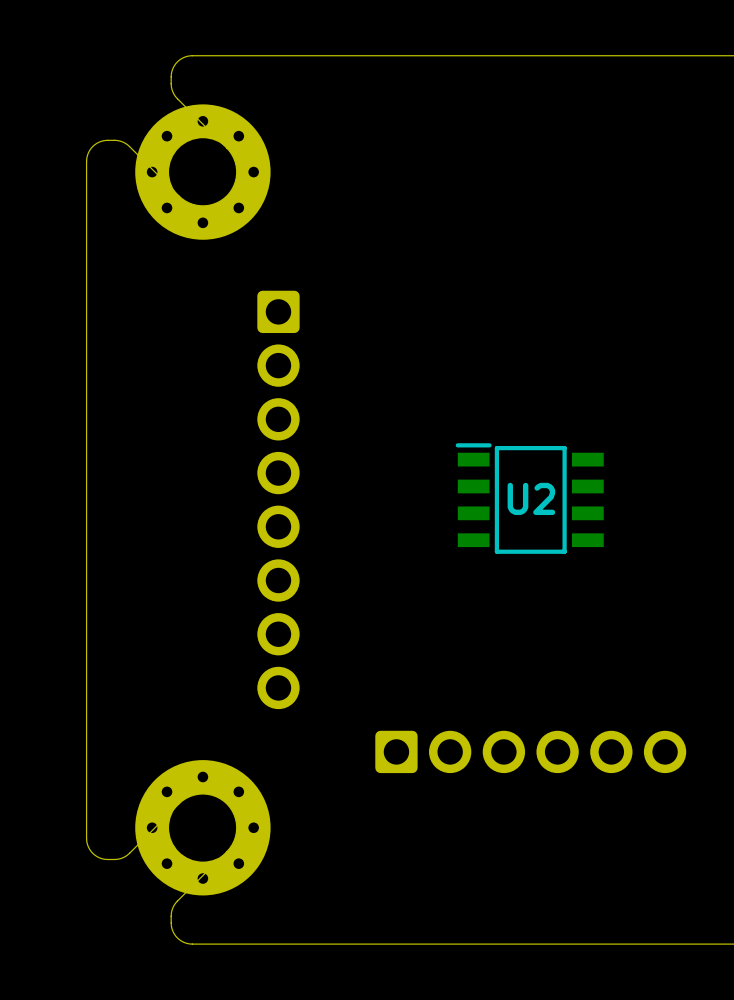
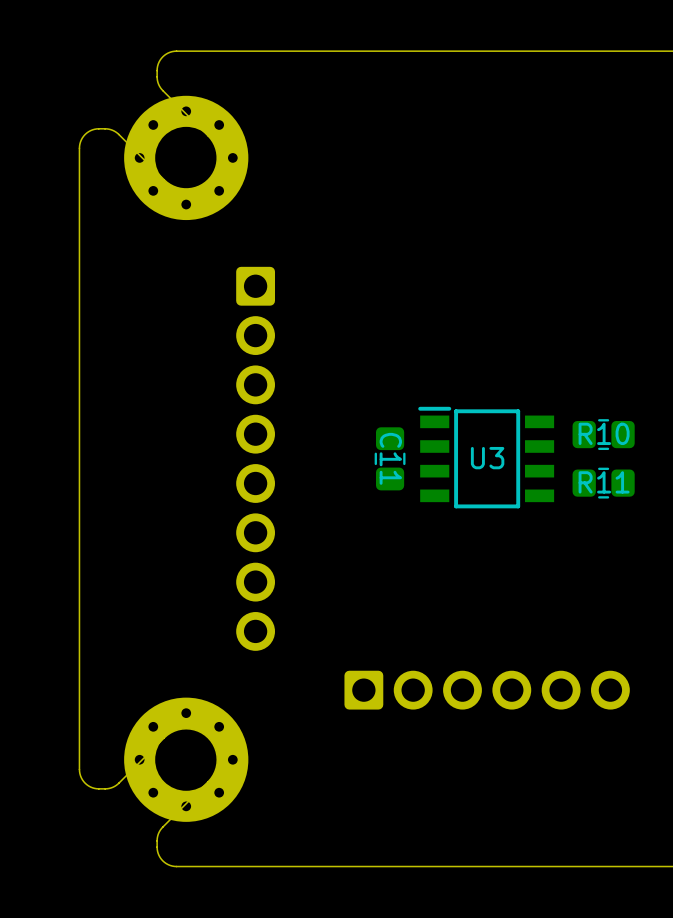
R10: none -> (603, 434)
U2 name: U2 (531, 498) -> U3 (487, 458)
C11: none -> (390, 458)
R11: none -> (603, 483)

